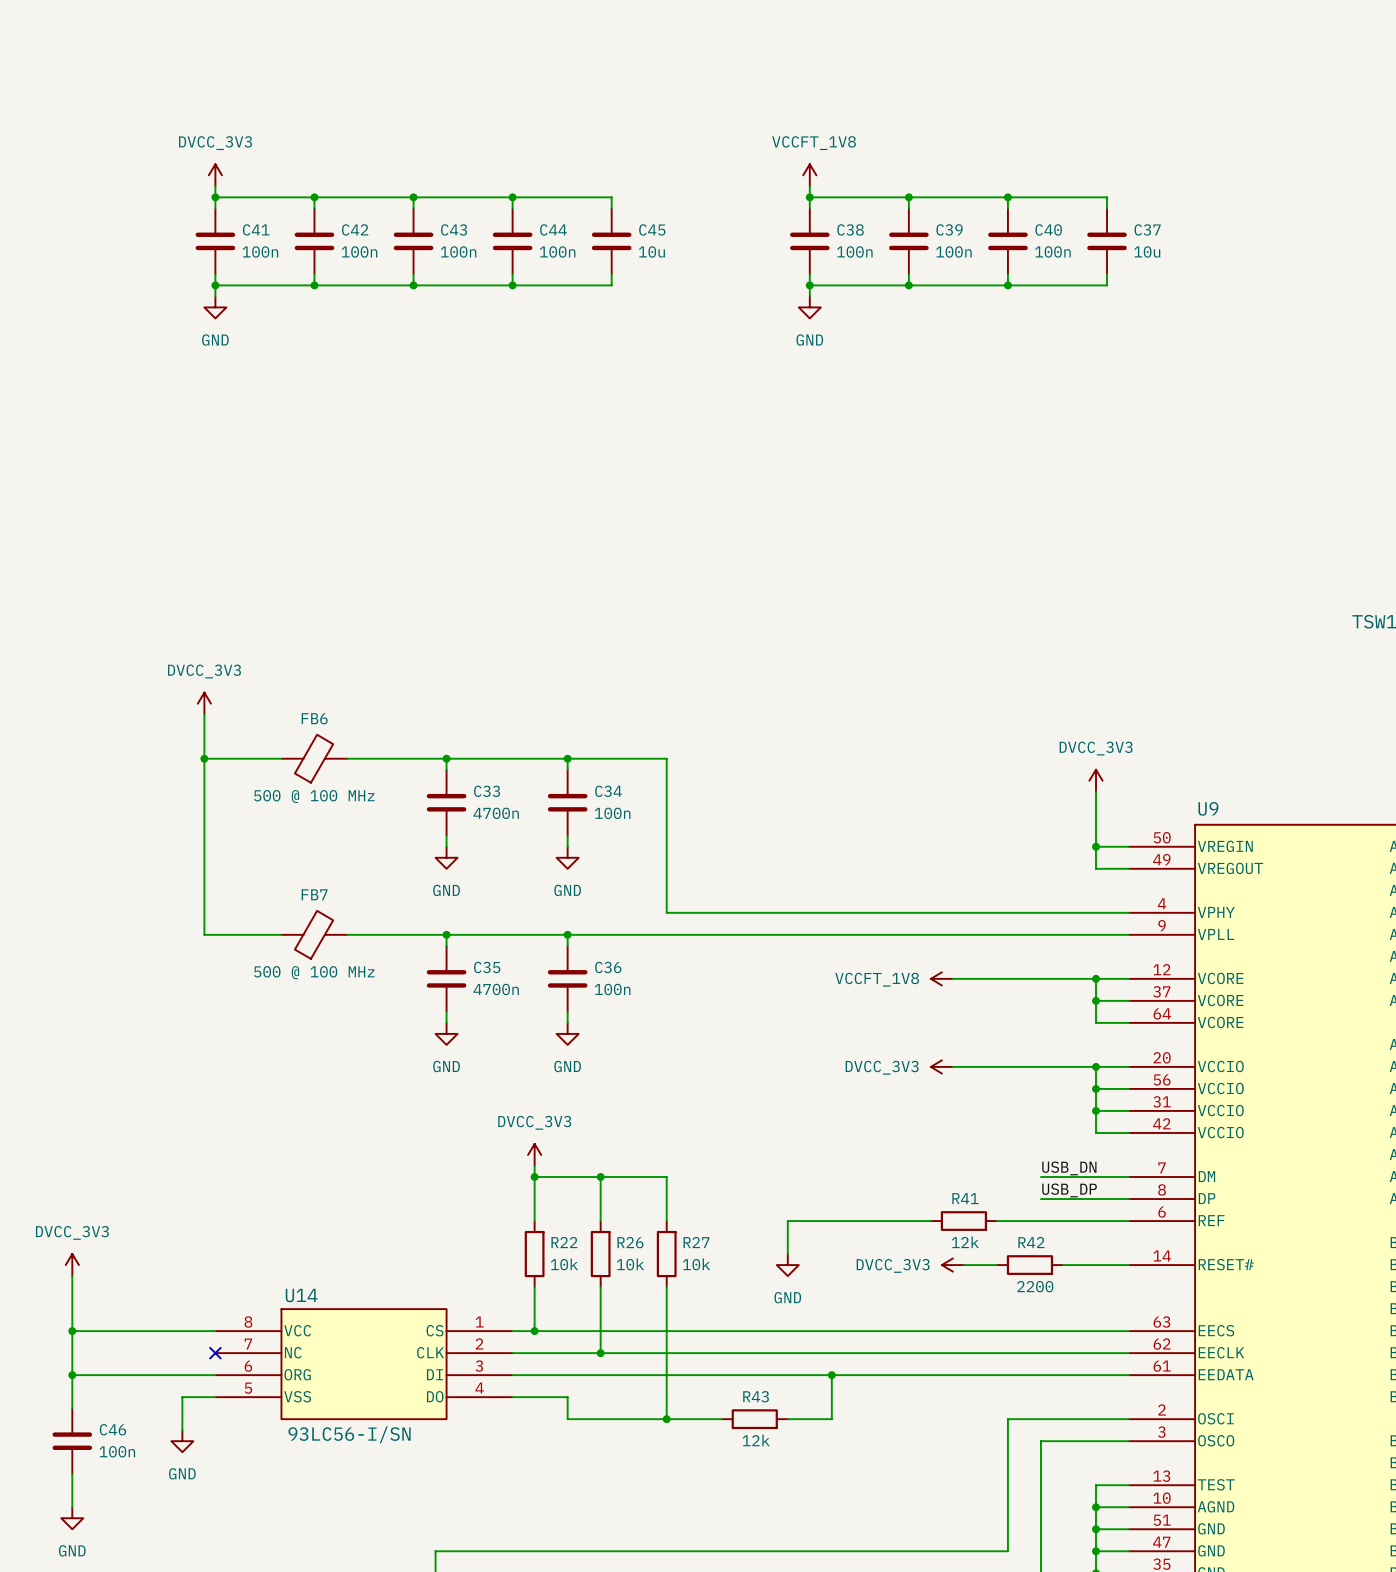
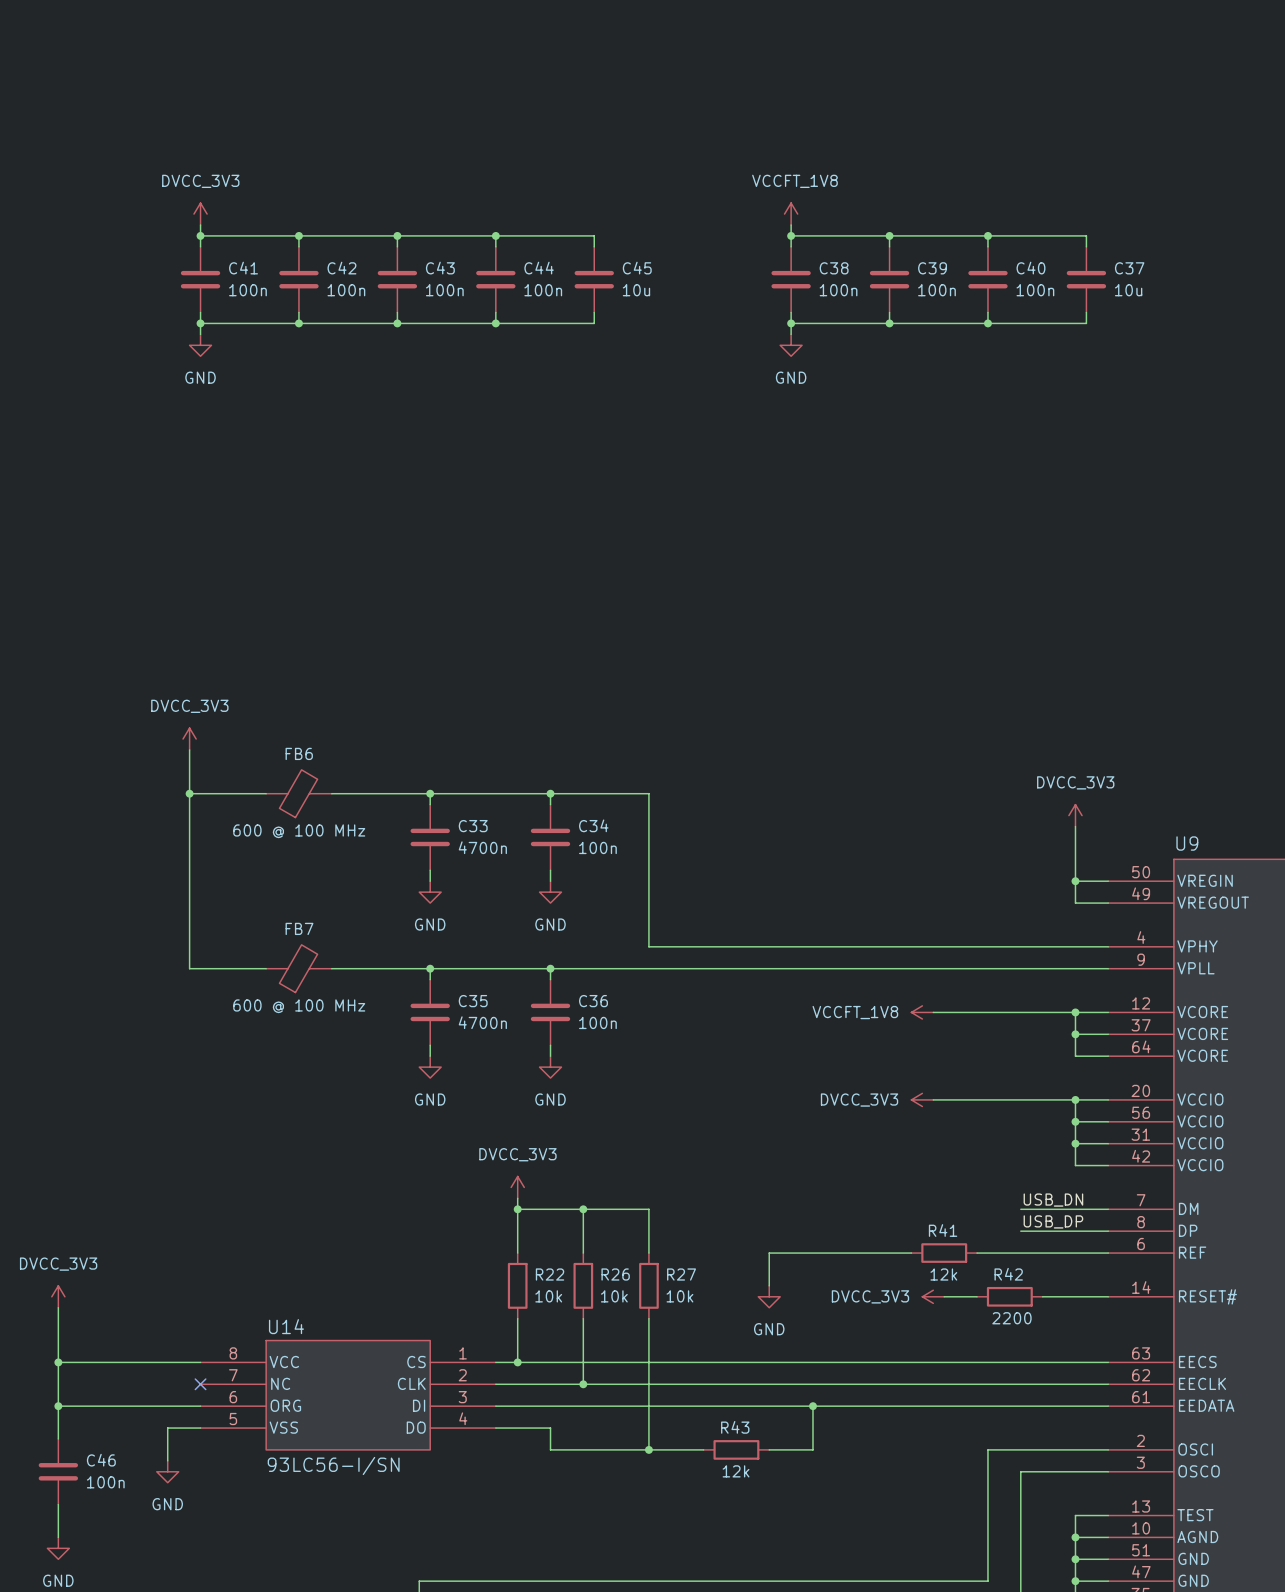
FB6 value: 500 @ 100 MHz (314, 796) -> 600 @ 100 MHz (299, 831)
FB7 value: 500 @ 100 MHz (314, 972) -> 600 @ 100 MHz (299, 1006)

